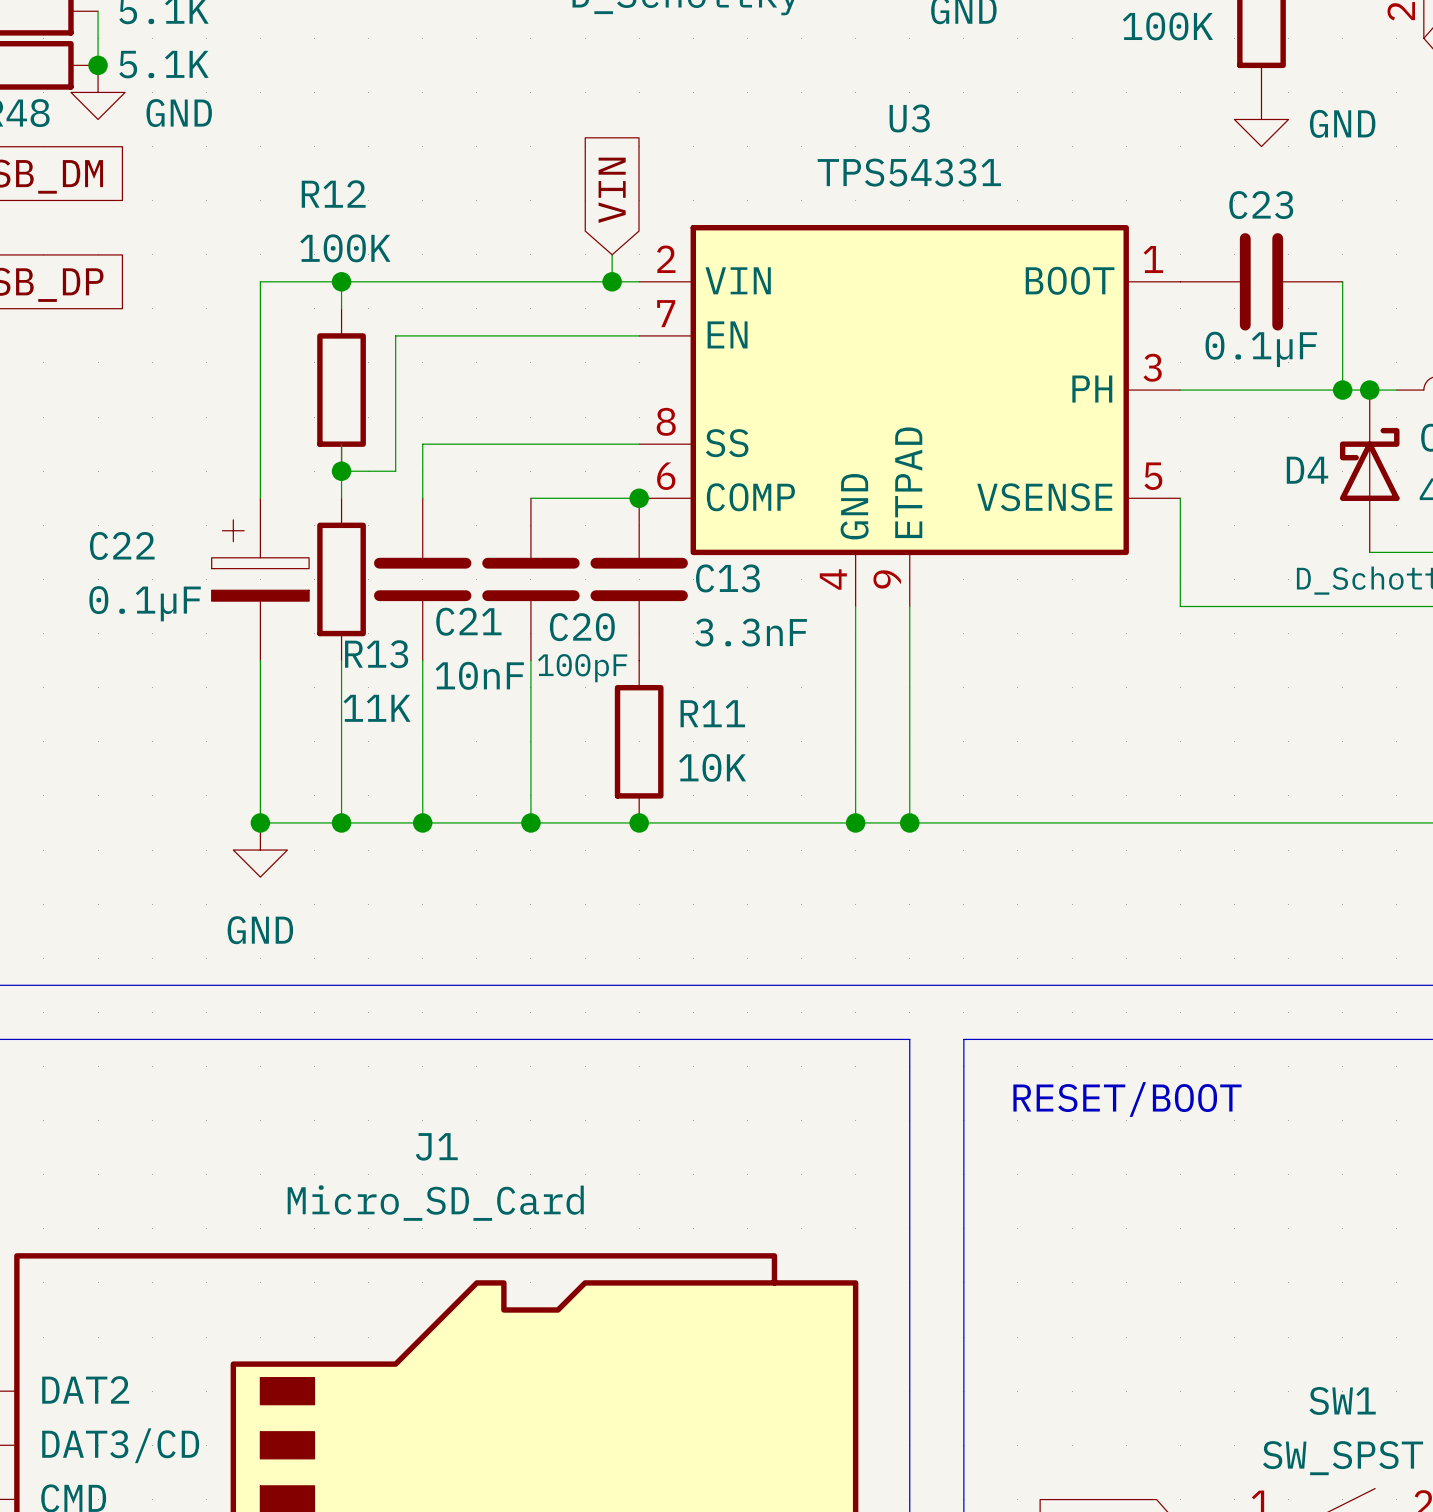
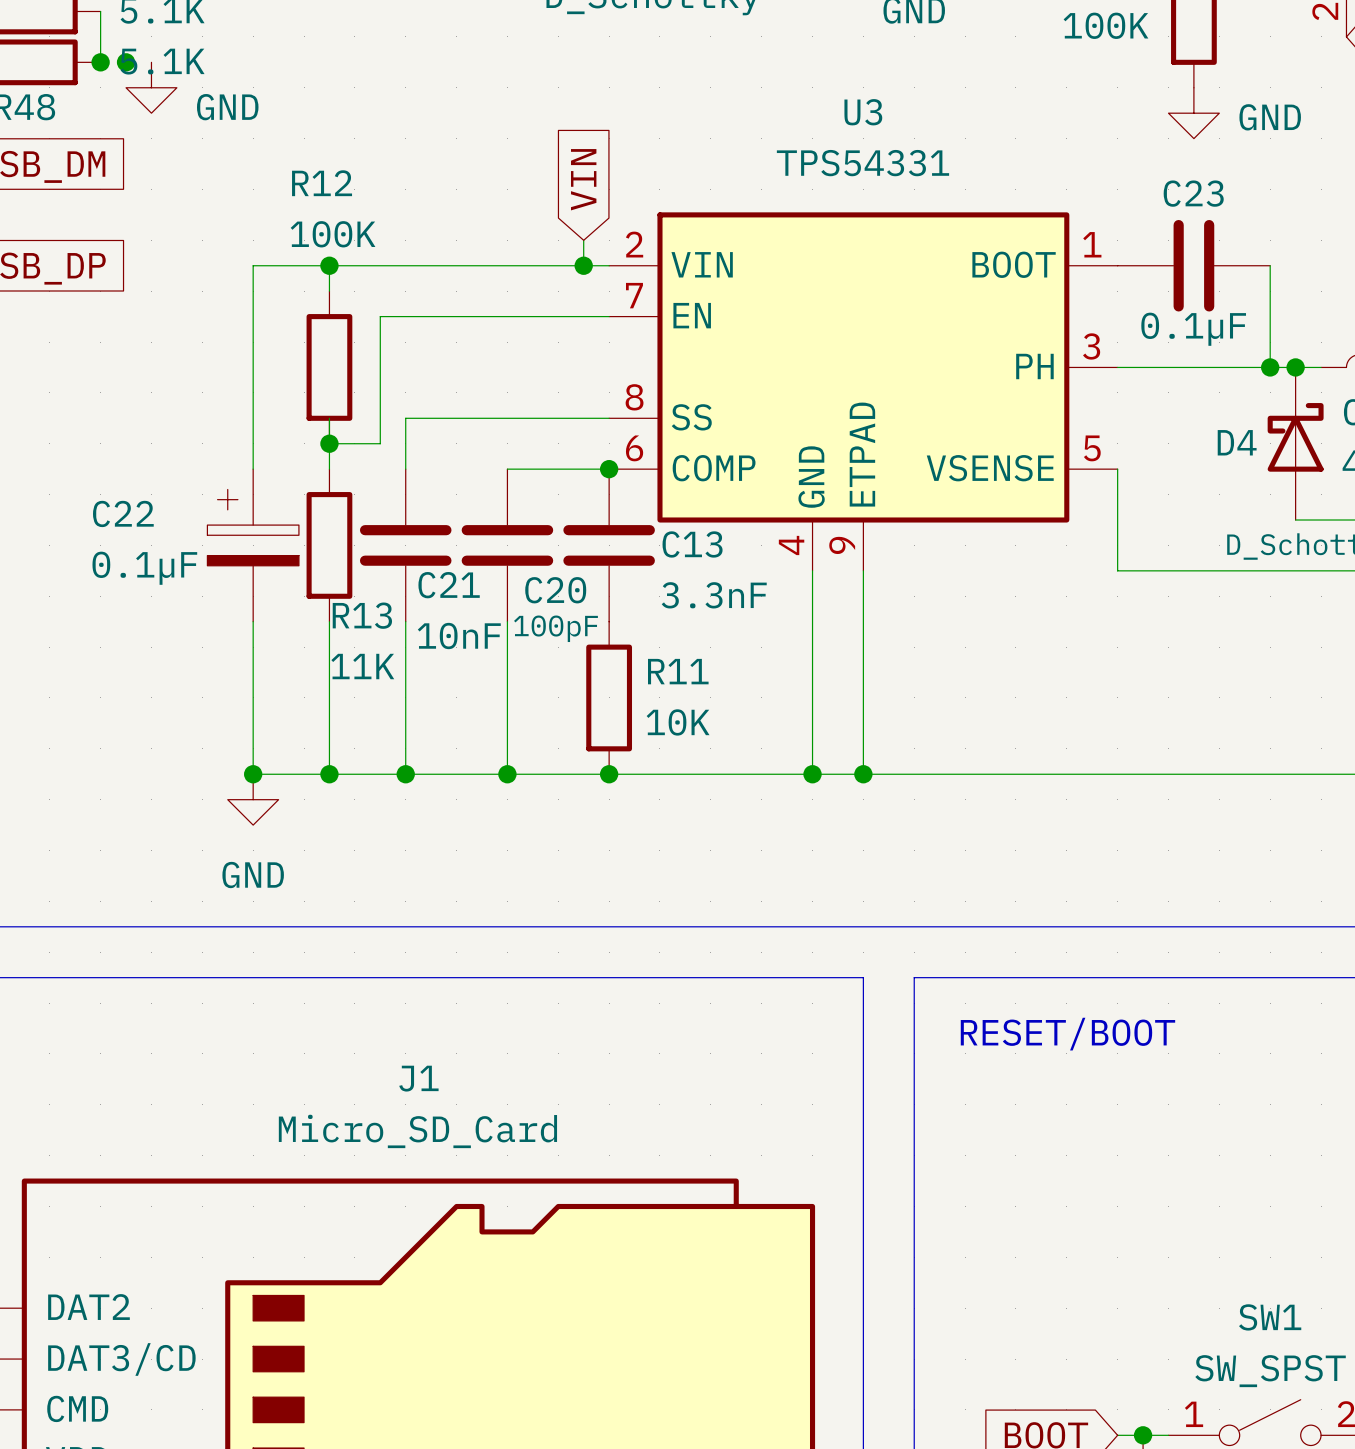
junction: none -> (126, 62)
power symbol position: GND (98, 92) -> GND (151, 87)

